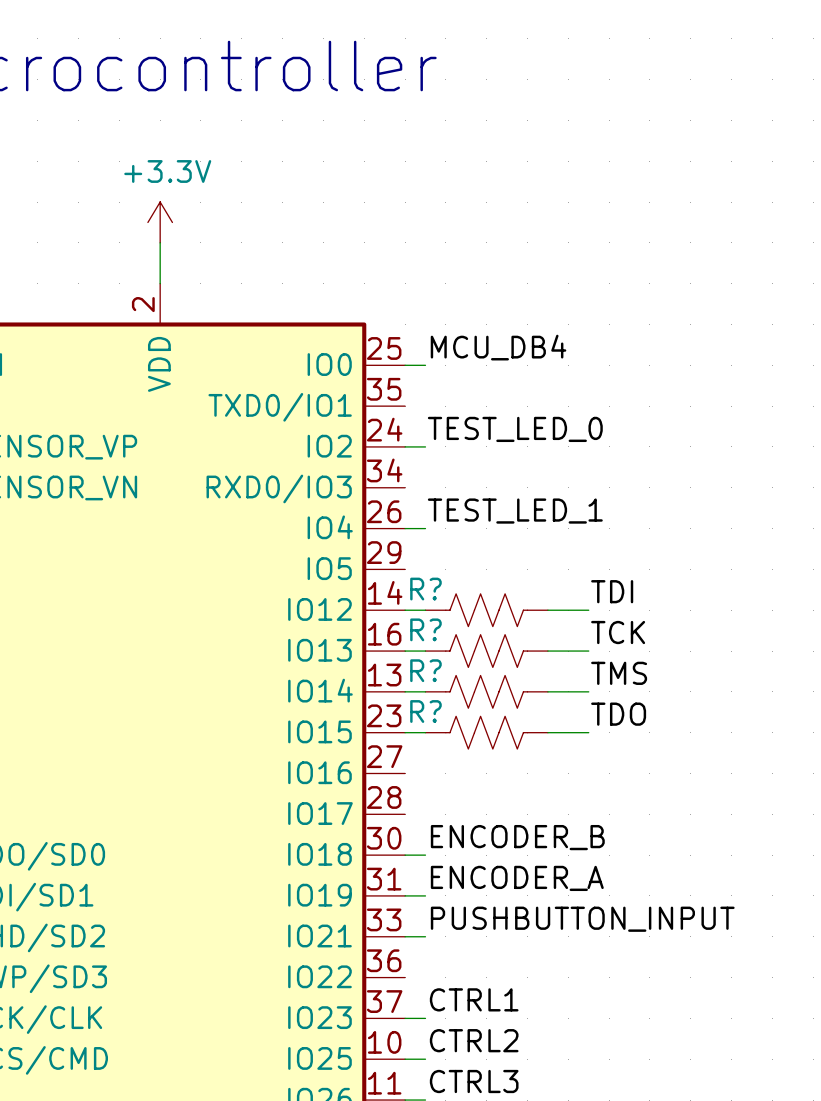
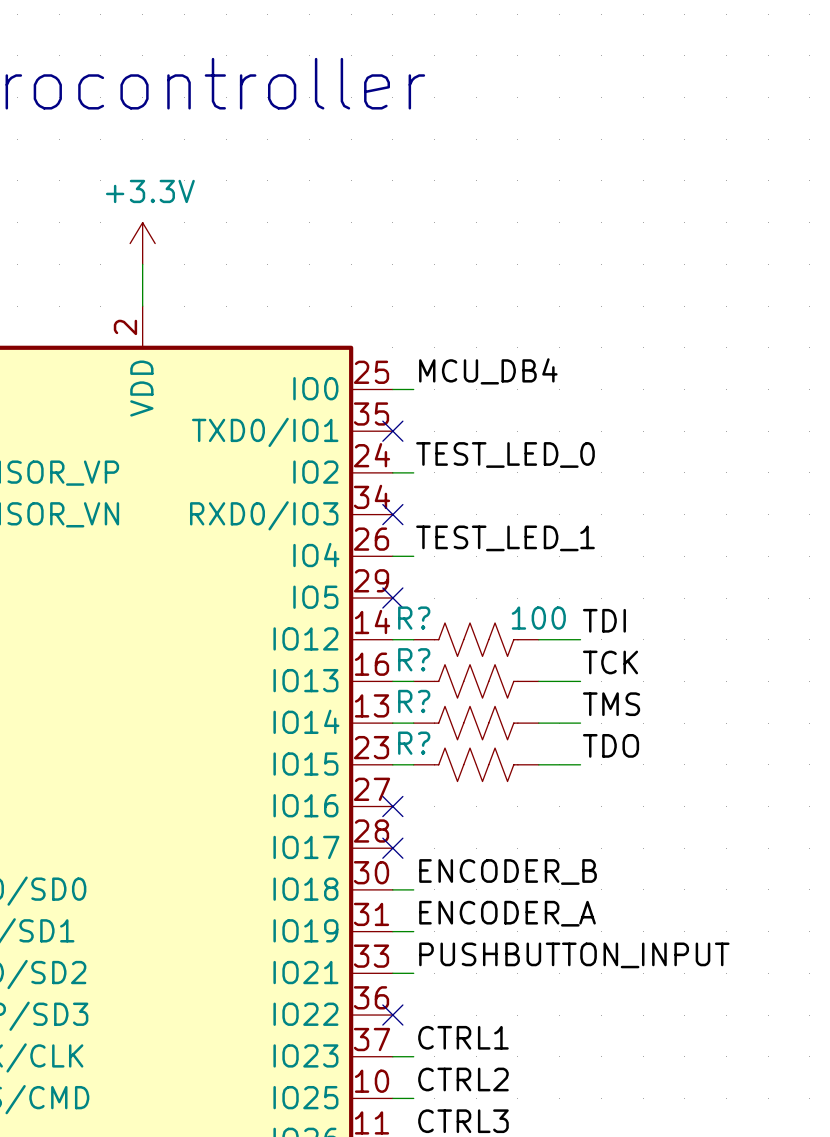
no-connect mark: none -> (392, 431)
no-connect mark: none -> (392, 514)
no-connect mark: none -> (392, 598)
R? value: none -> 100 (538, 618)
no-connect mark: none -> (392, 806)
no-connect mark: none -> (392, 848)
no-connect mark: none -> (392, 1015)

